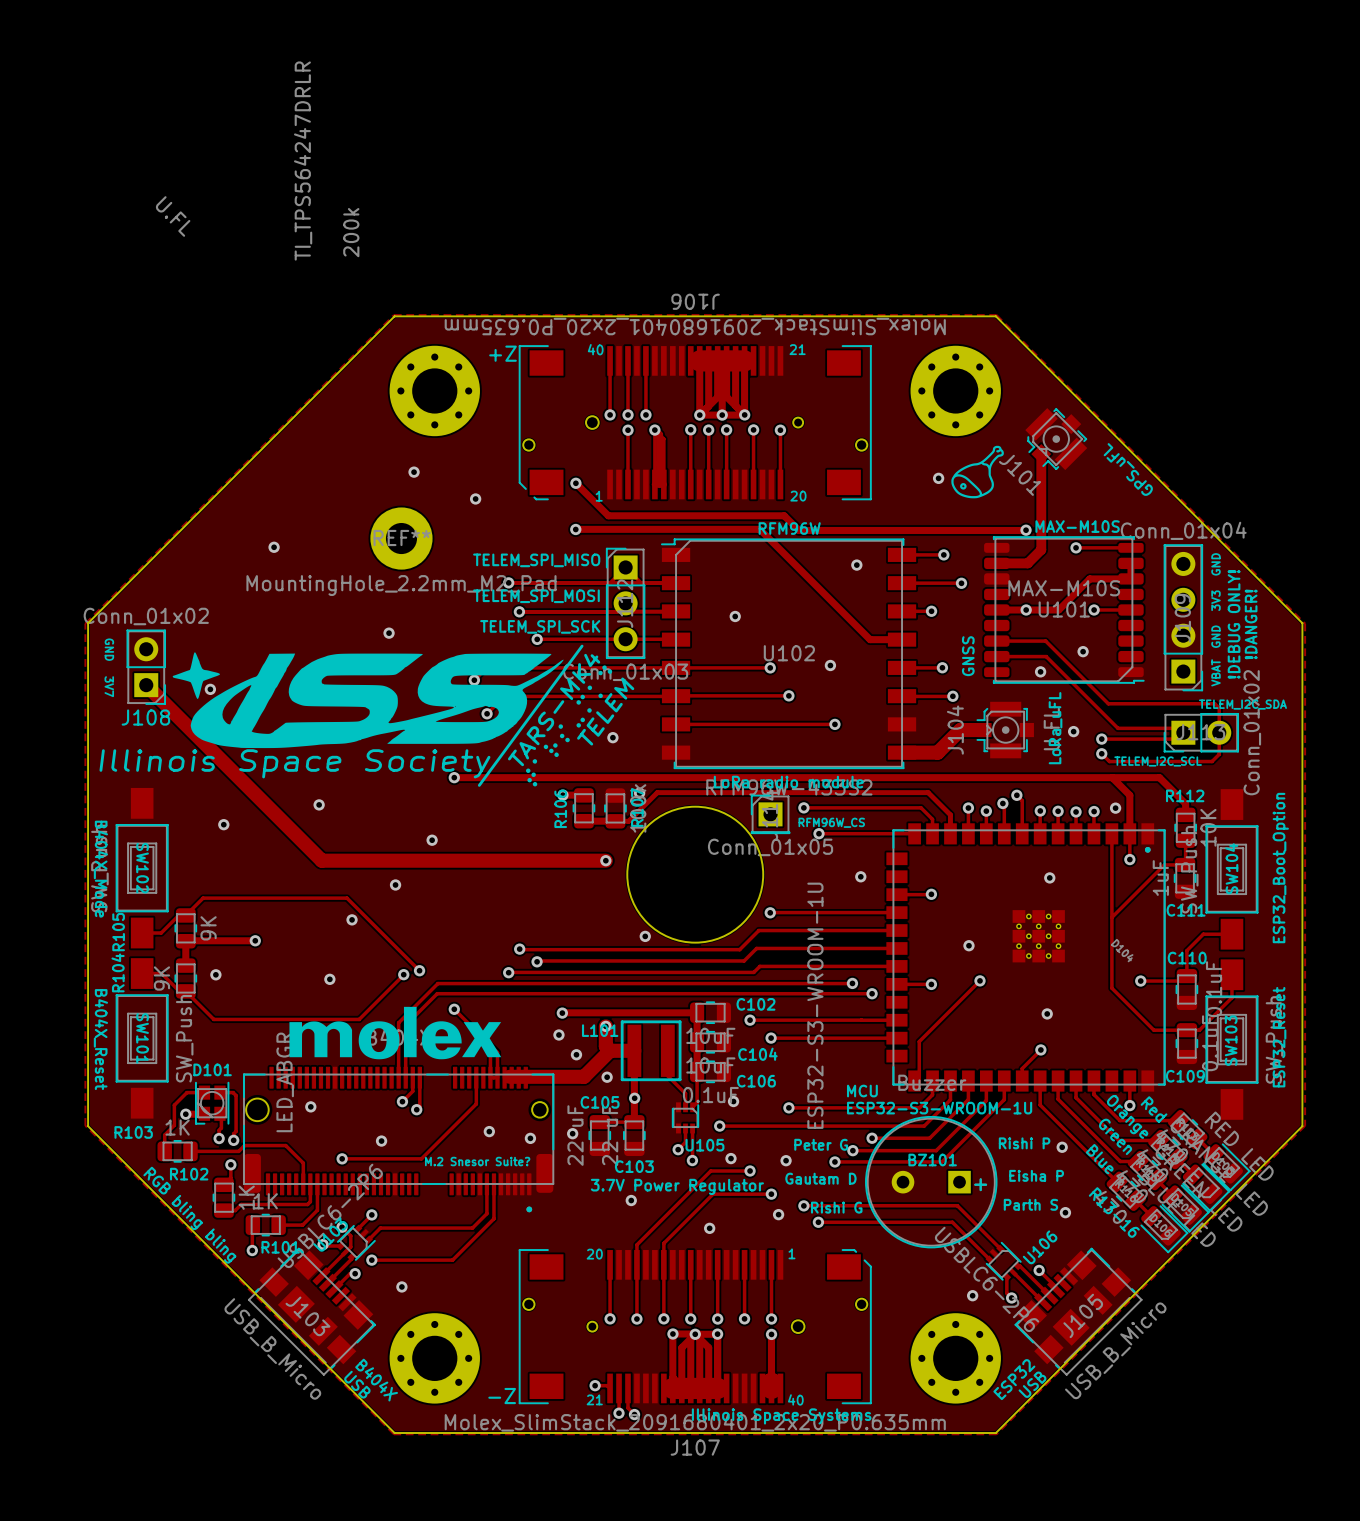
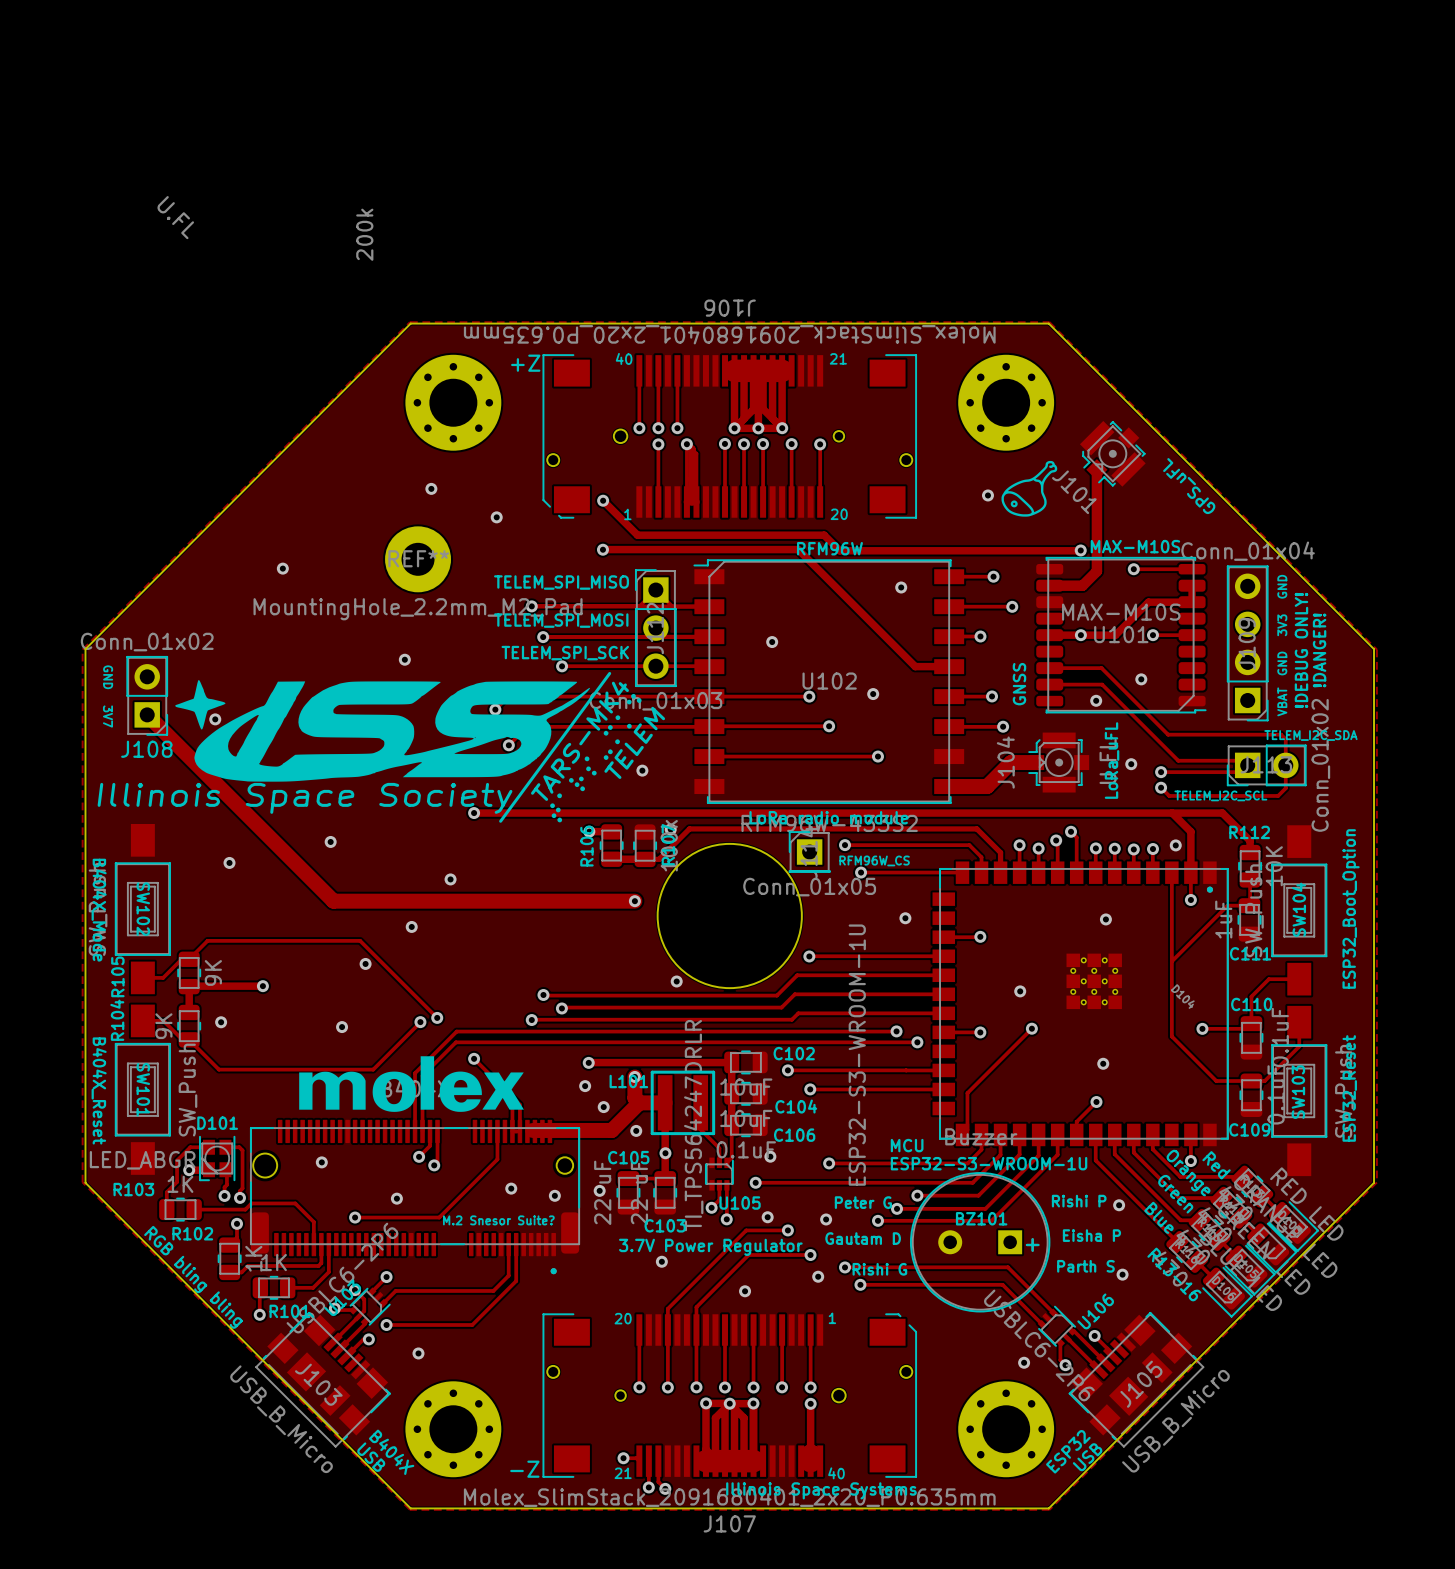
U105 value position: TI_TPS564247DRLR (303, 161) -> TI_TPS564247DRLR (693, 1125)
D101 value rotation: 0° (285, 1082) -> 90° clockwise (142, 1160)
D101 value position: LED_ABGR (285, 1082) -> LED_ABGR (142, 1160)

